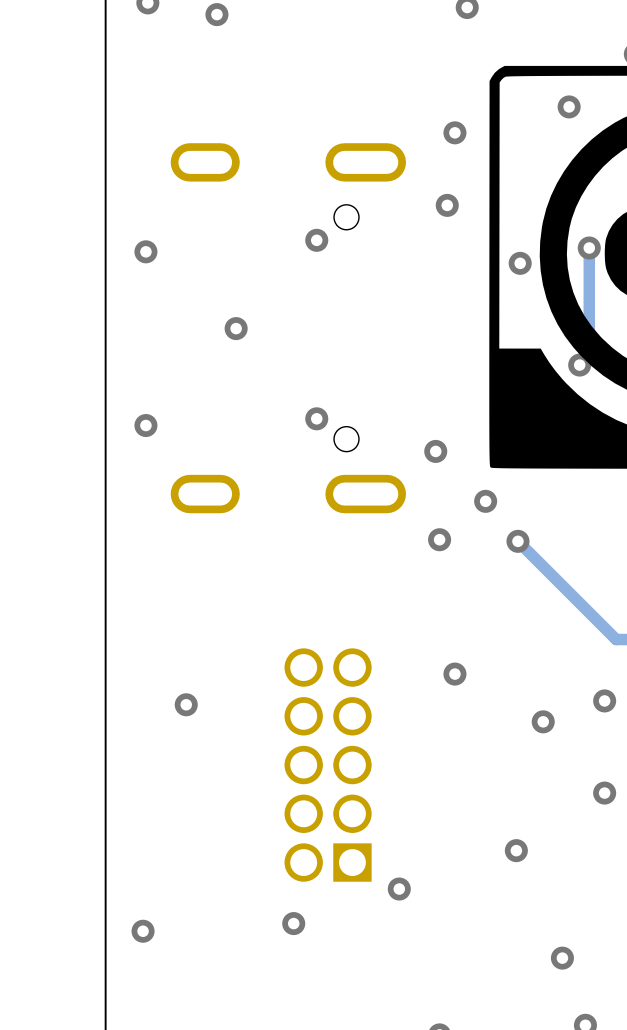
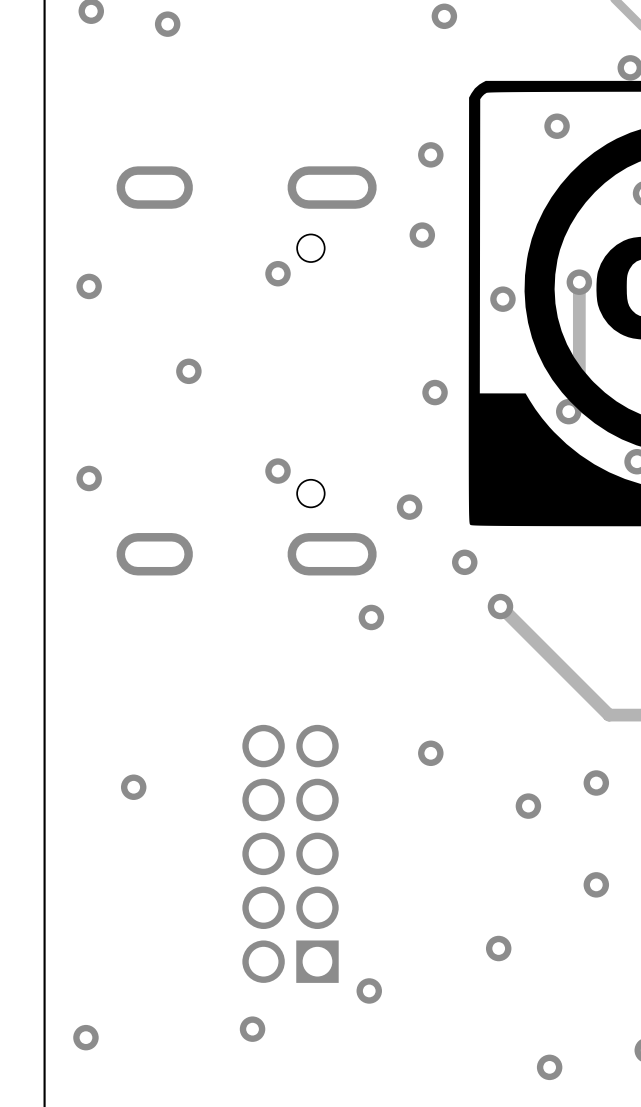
via: none -> (435, 392)
via position: (439, 539) -> (371, 617)

